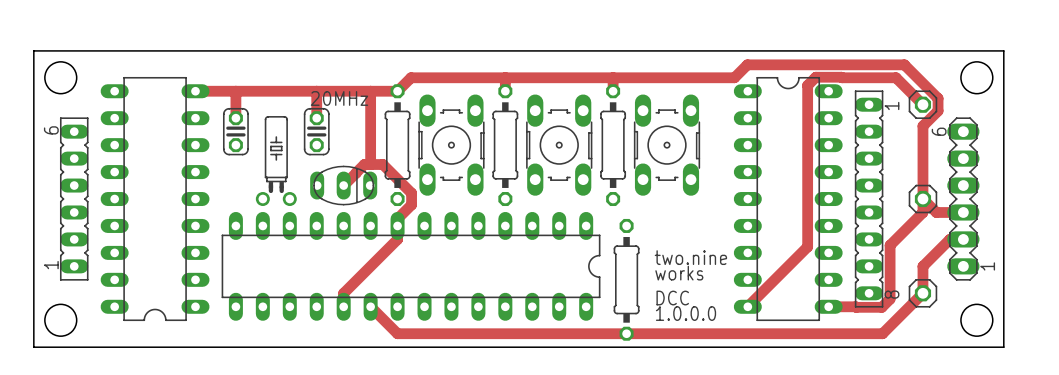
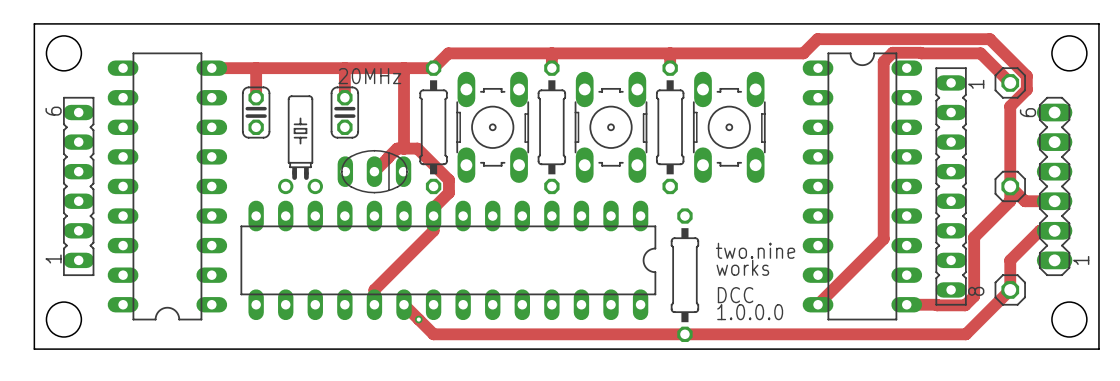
via: none -> (418, 319)

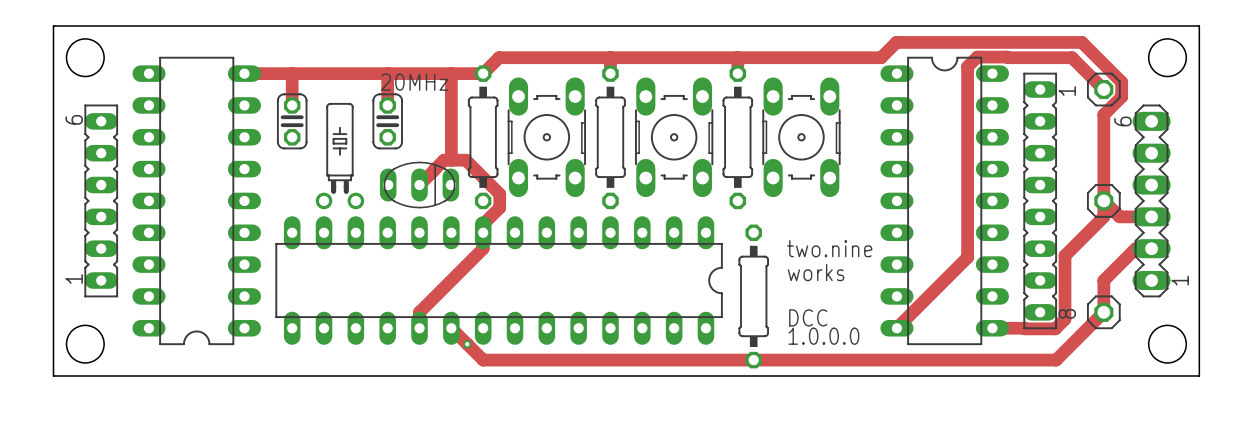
text: none -> two.nine (829, 248)
text: two.nine (755, 250) -> works (816, 272)
text: works (742, 267) -> none

